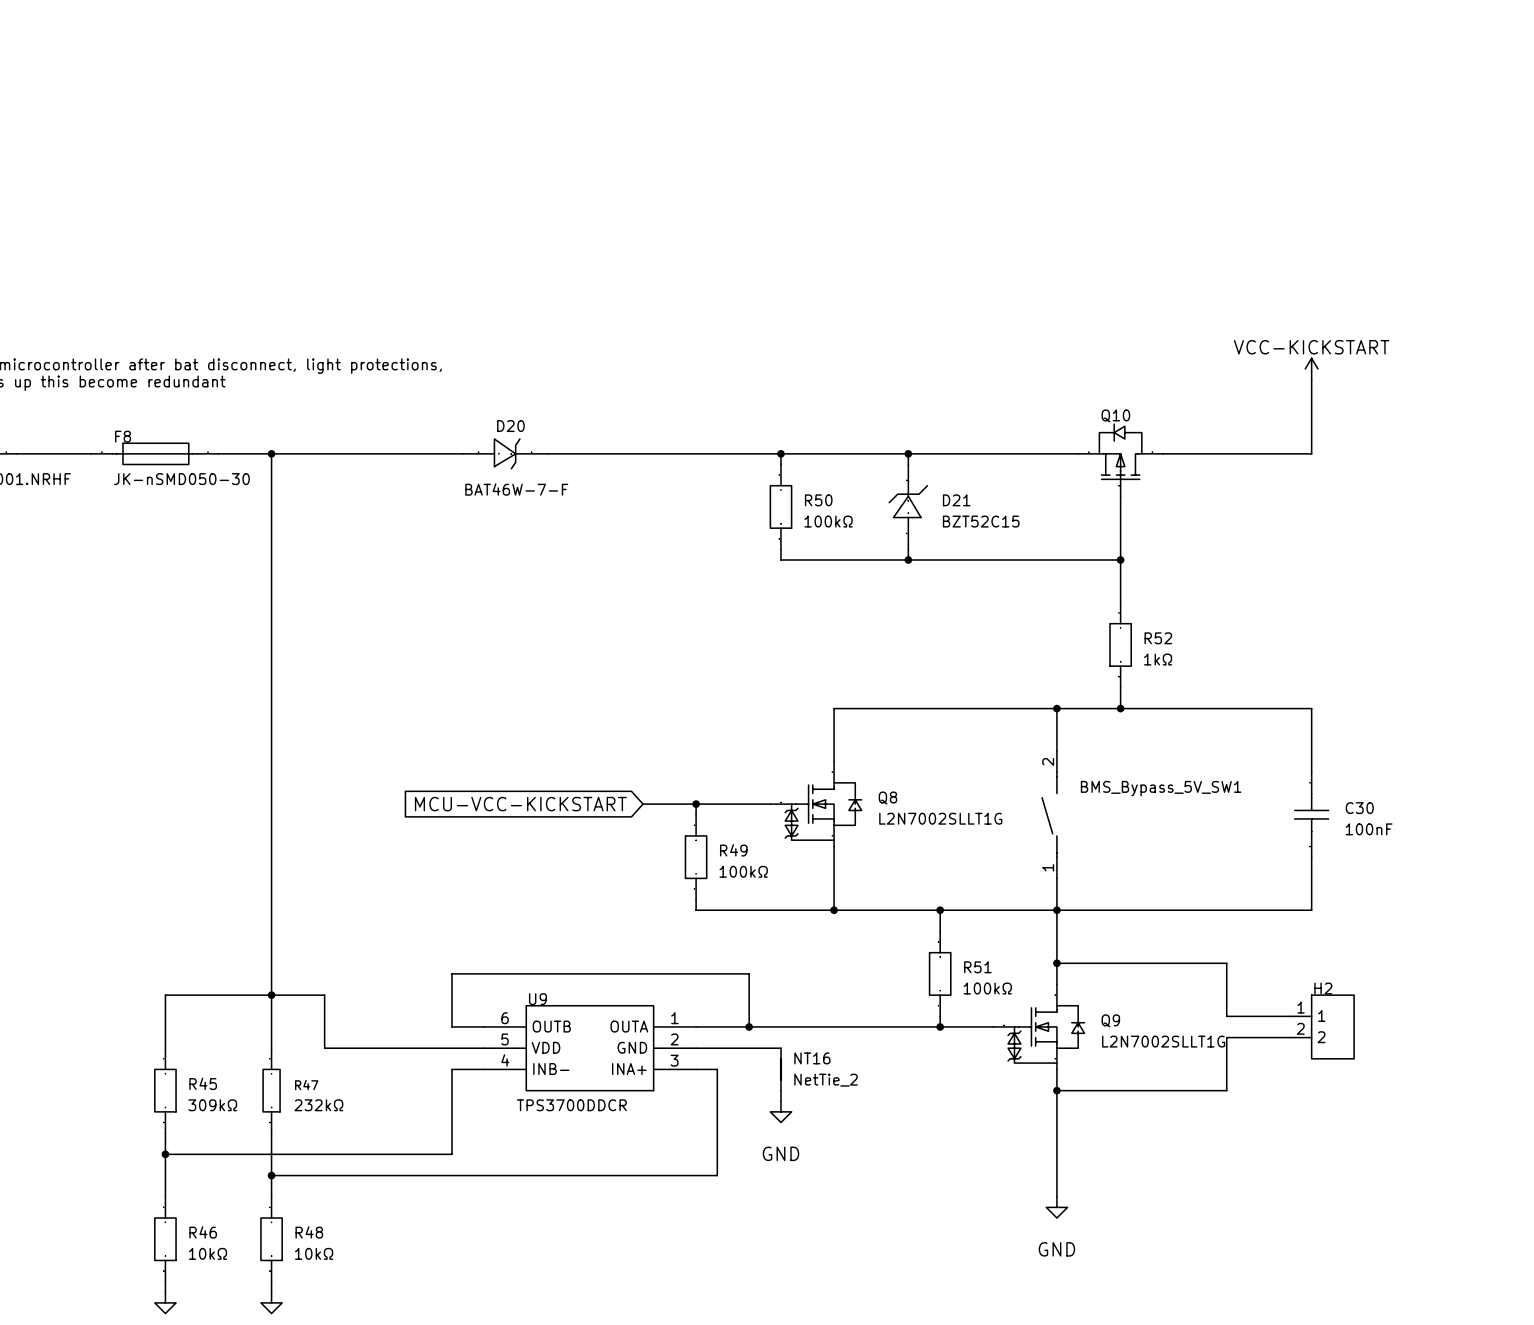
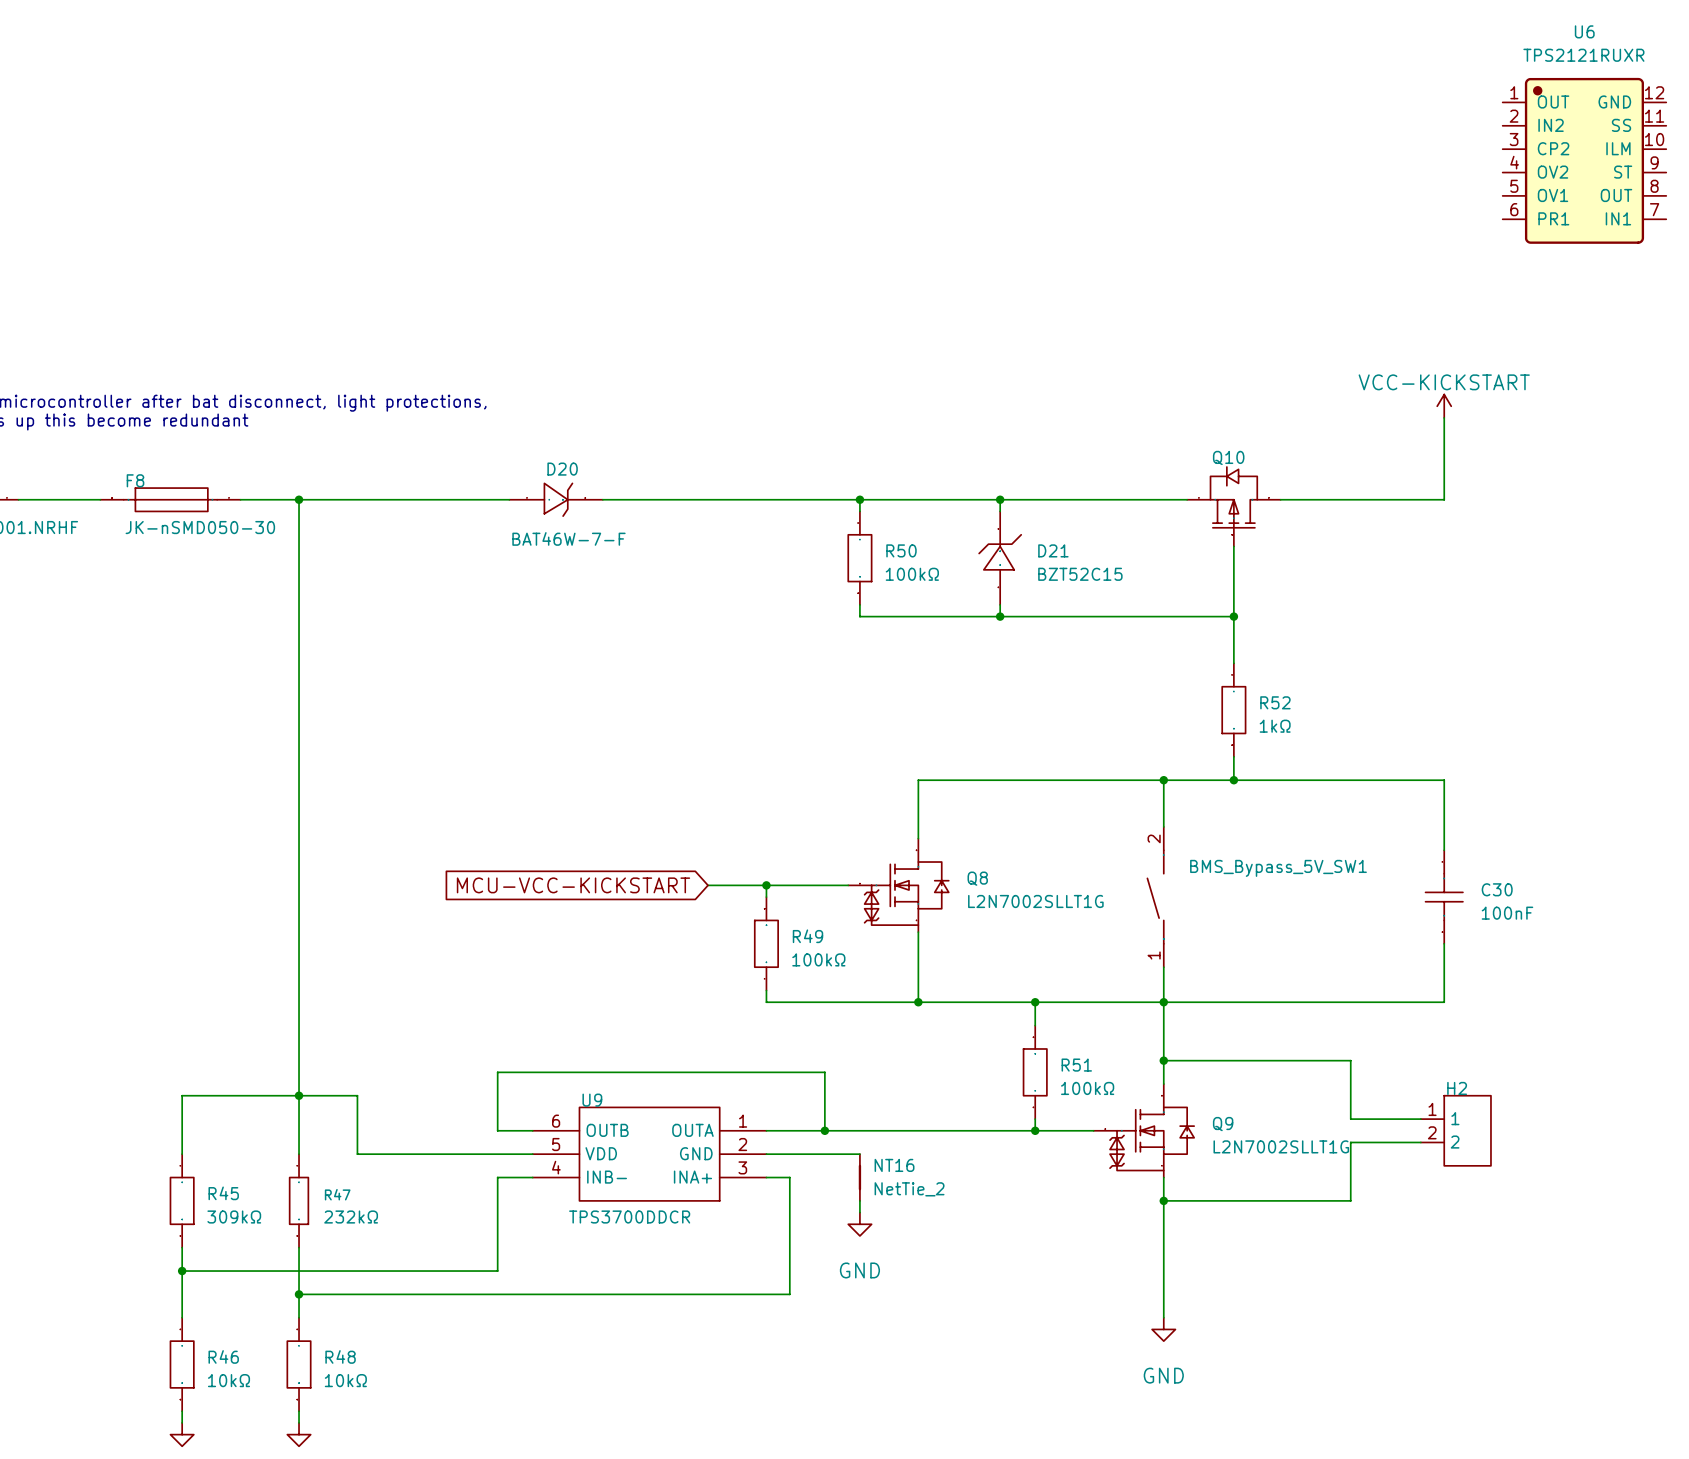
U6: none -> TPS2121RUXR (1584, 160)

